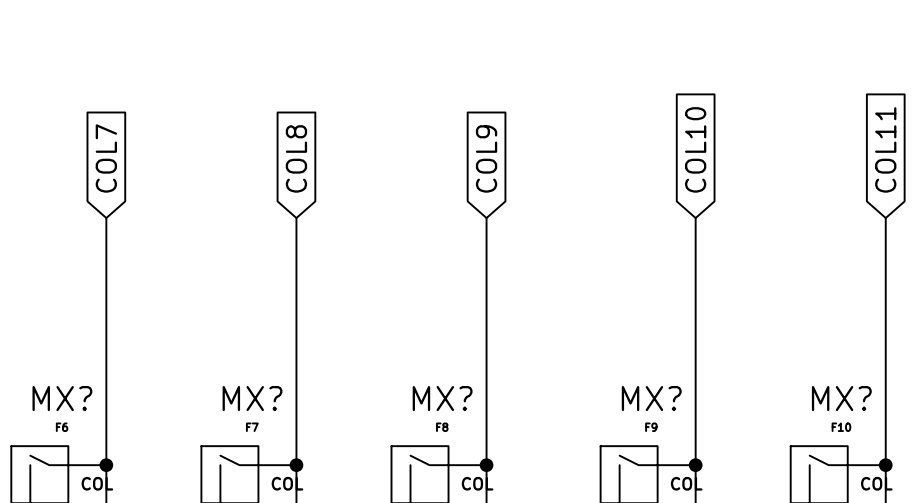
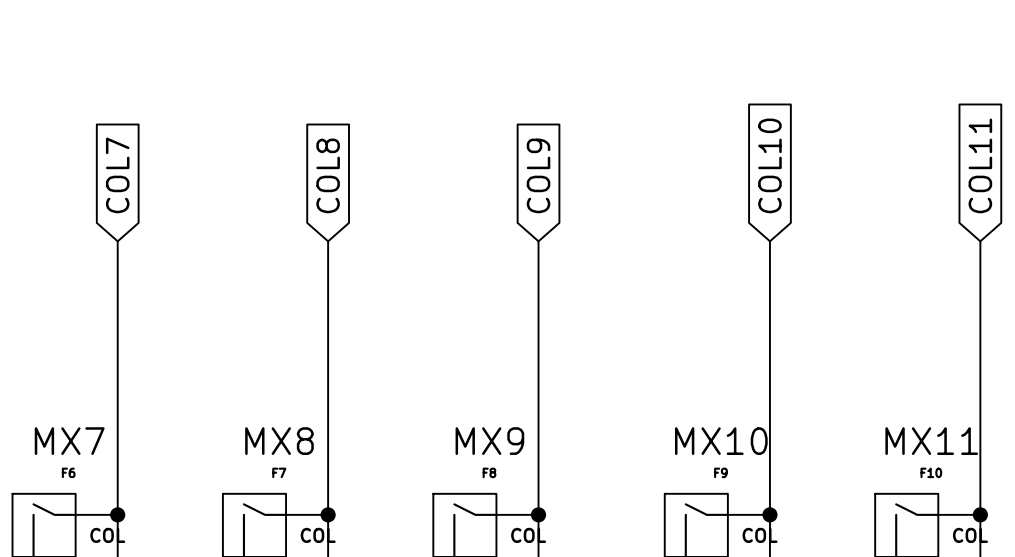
MX? name: MX? (62, 398) -> MX7 (69, 441)
MX? name: MX? (252, 398) -> MX8 (279, 441)
MX? name: MX? (442, 398) -> MX9 (489, 441)
MX? name: MX? (651, 398) -> MX10 (721, 441)
MX? name: MX? (841, 398) -> MX11 (931, 441)

